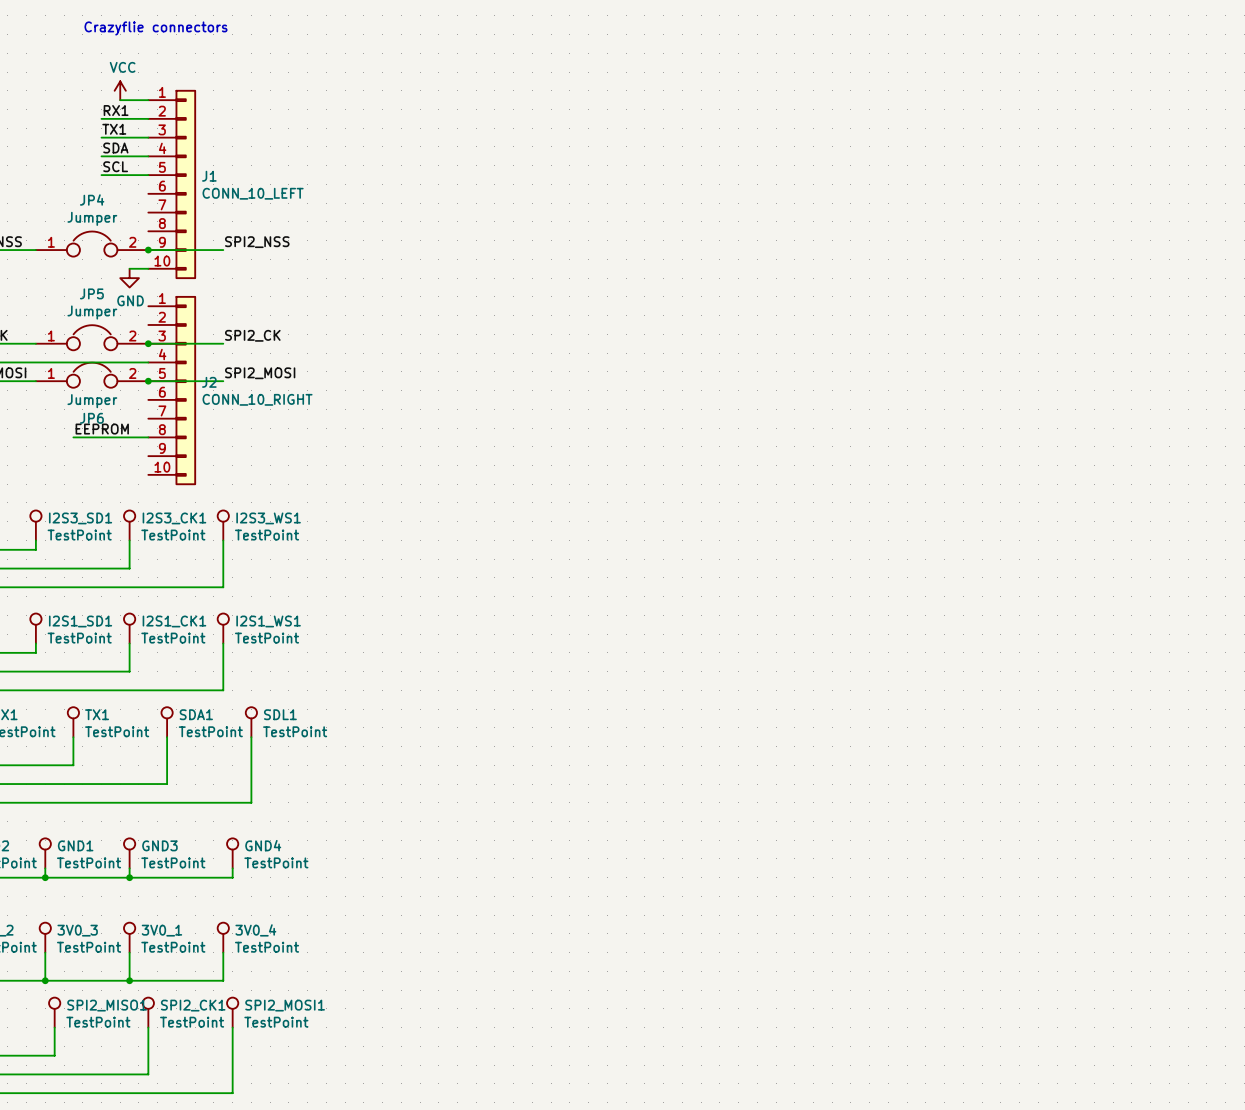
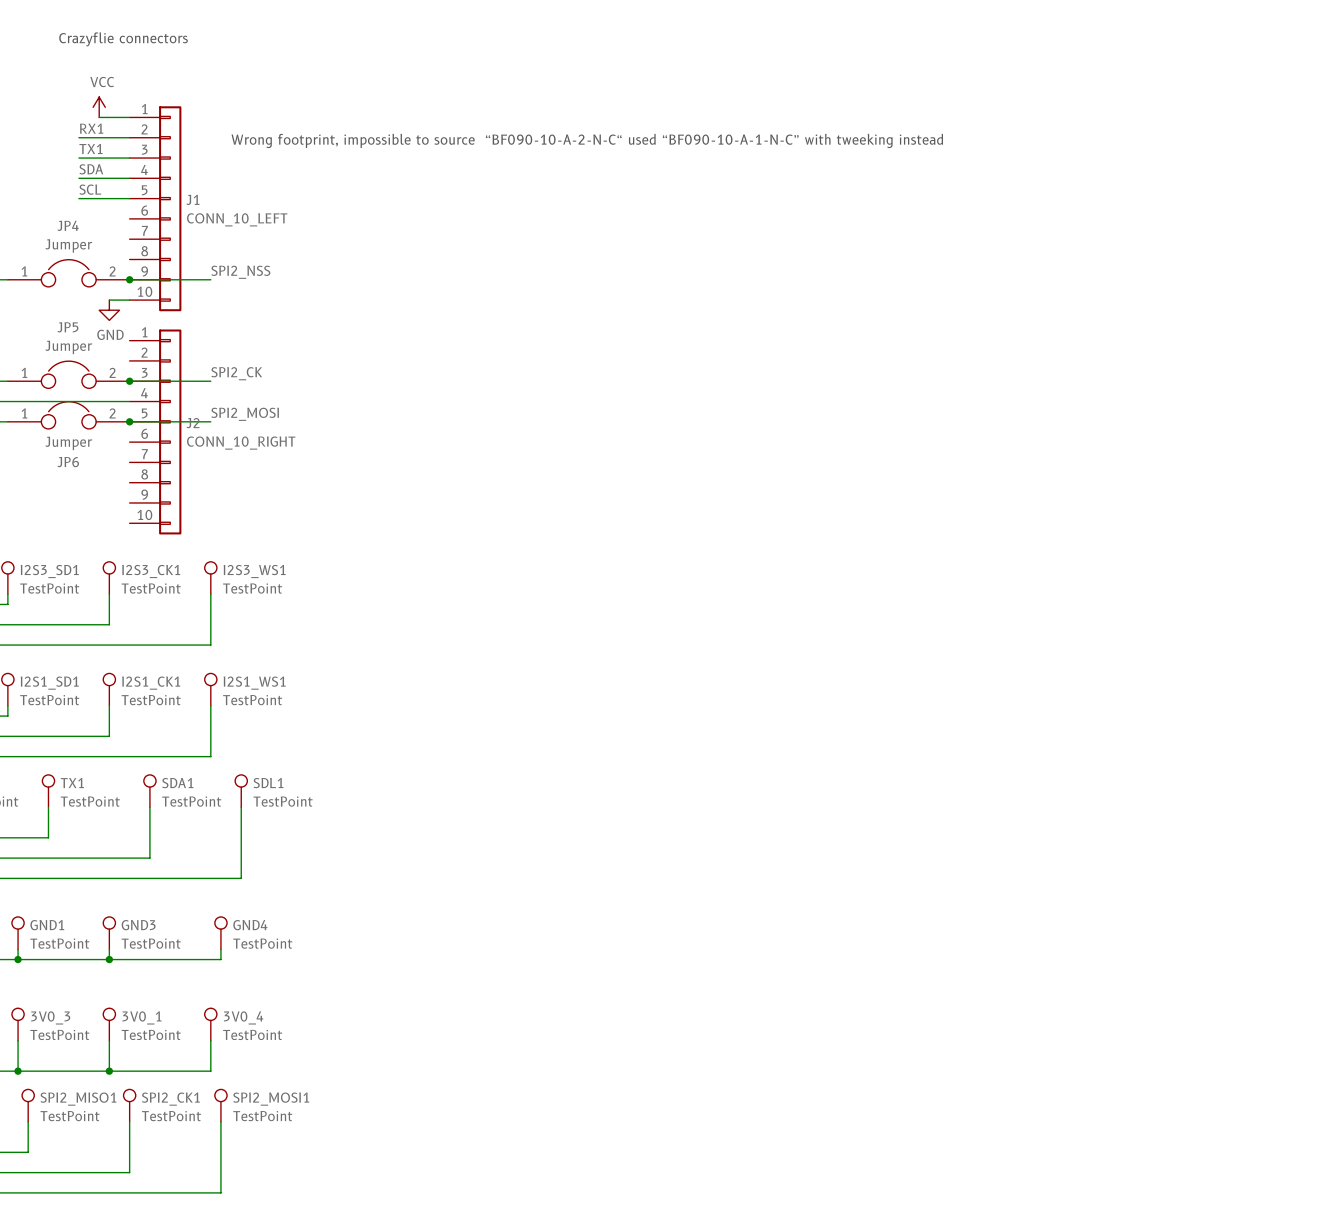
text: none -> Wrong footprint, impossible to source “BF090-10-A-2-N-C“ used “BF090-10-A-1-N-C” with tweeking instead (587, 140)
label: EEPROM (102, 429) -> none
wire: (73, 437) (148, 437) -> none

